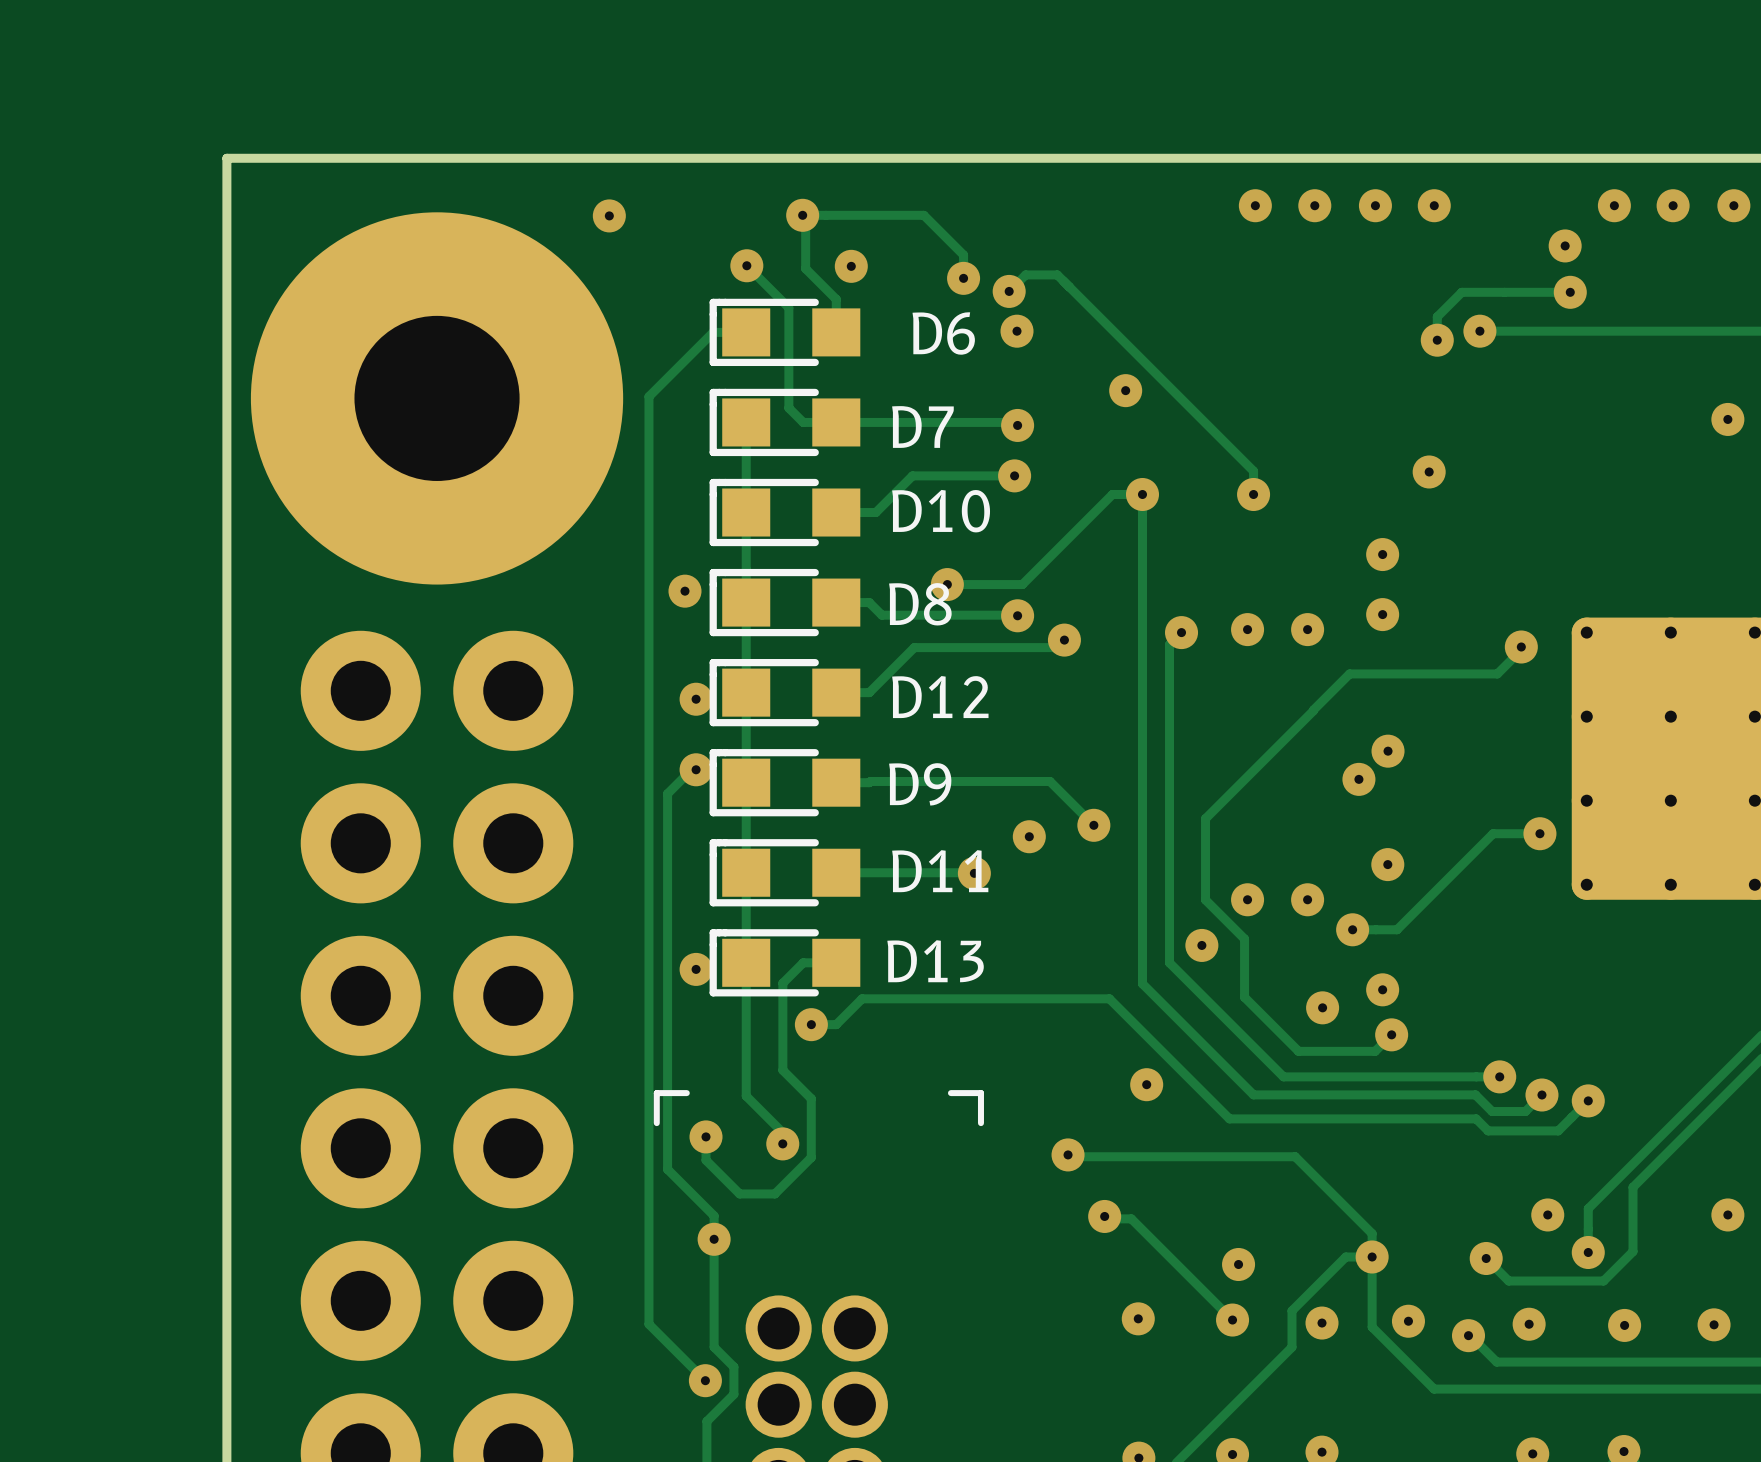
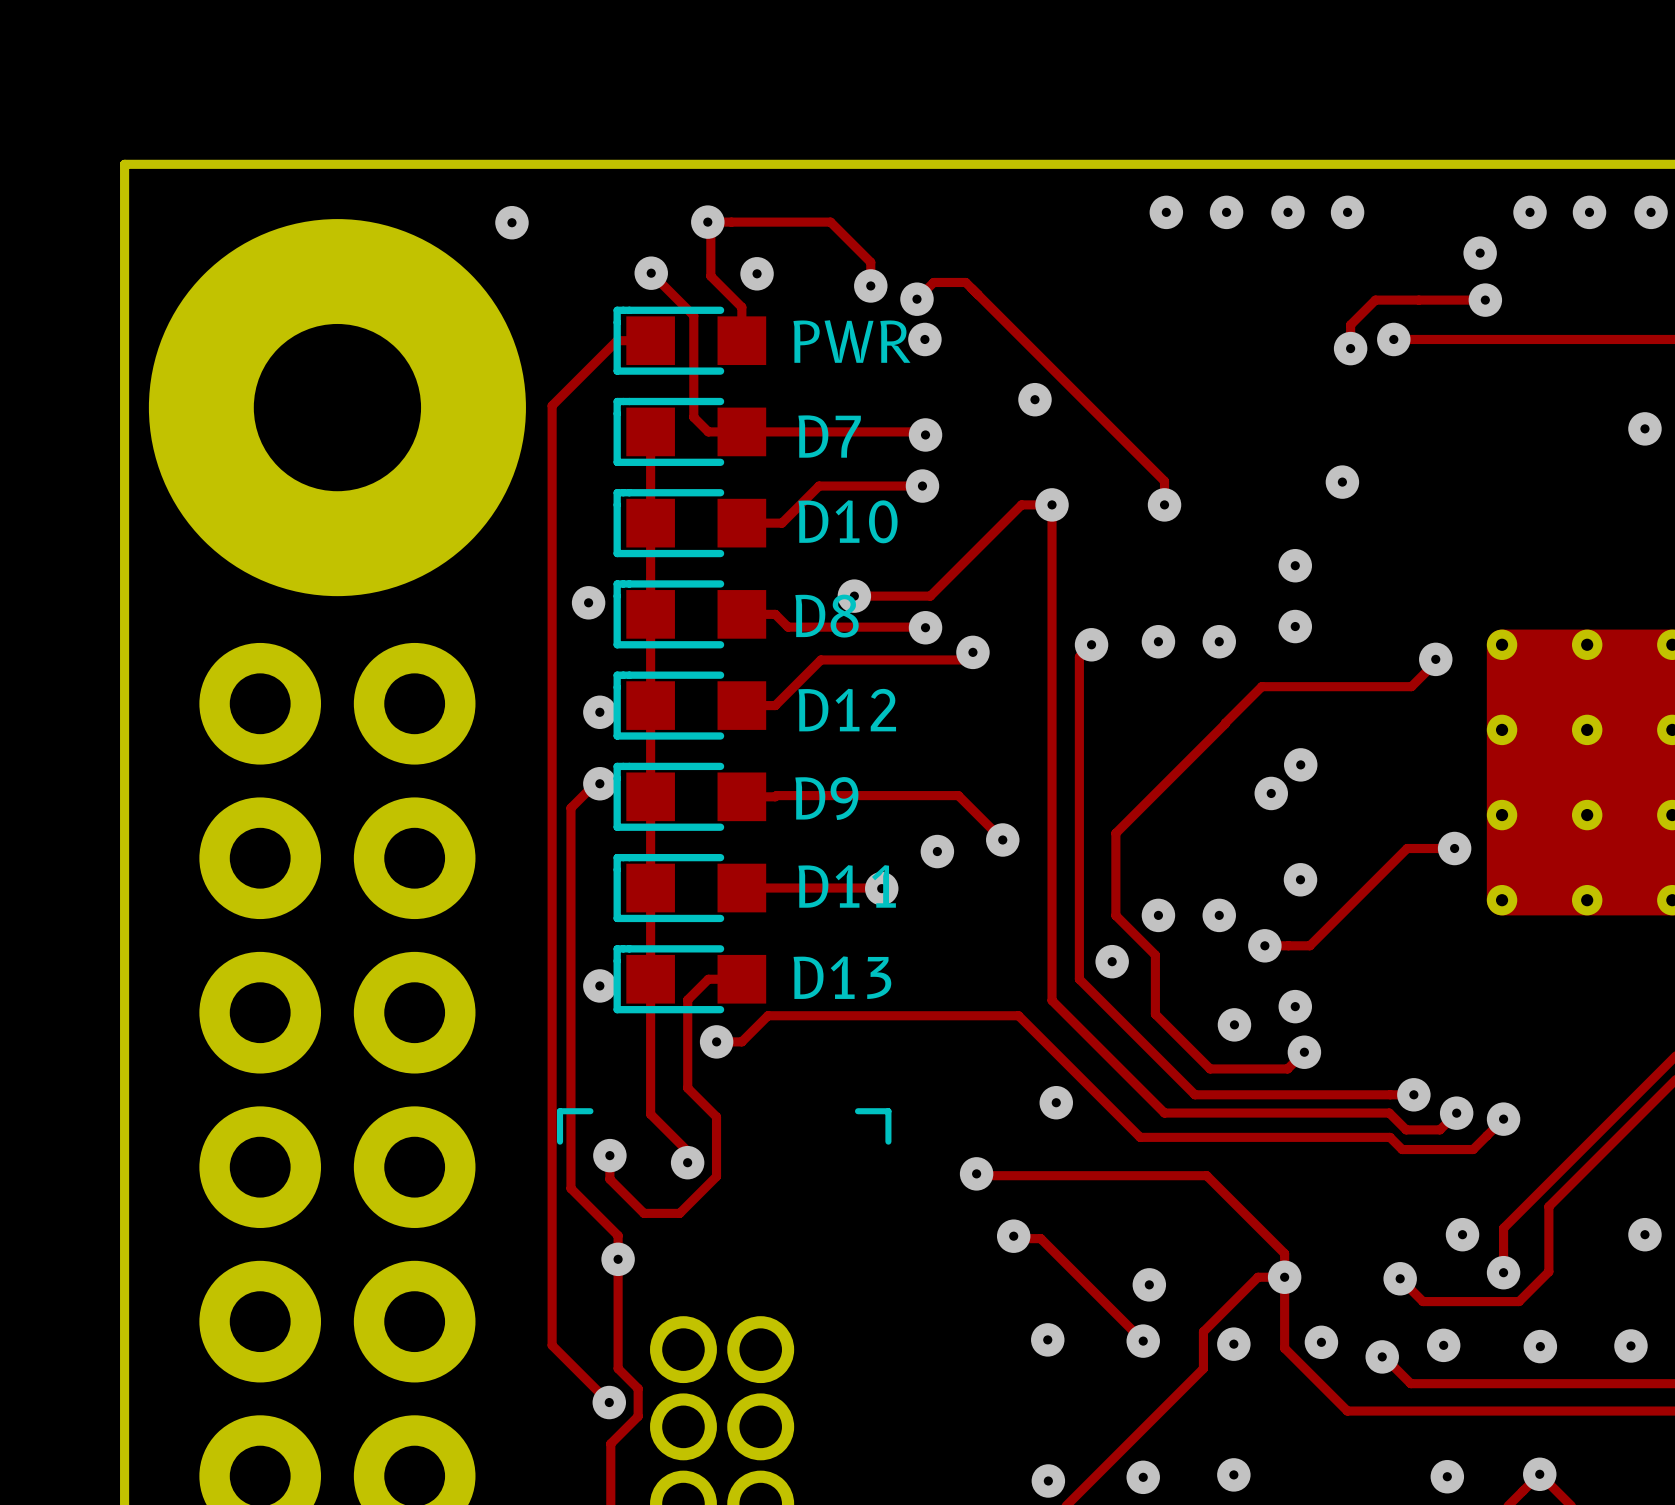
D6 name: D6 (943, 333) -> PWR (851, 341)

